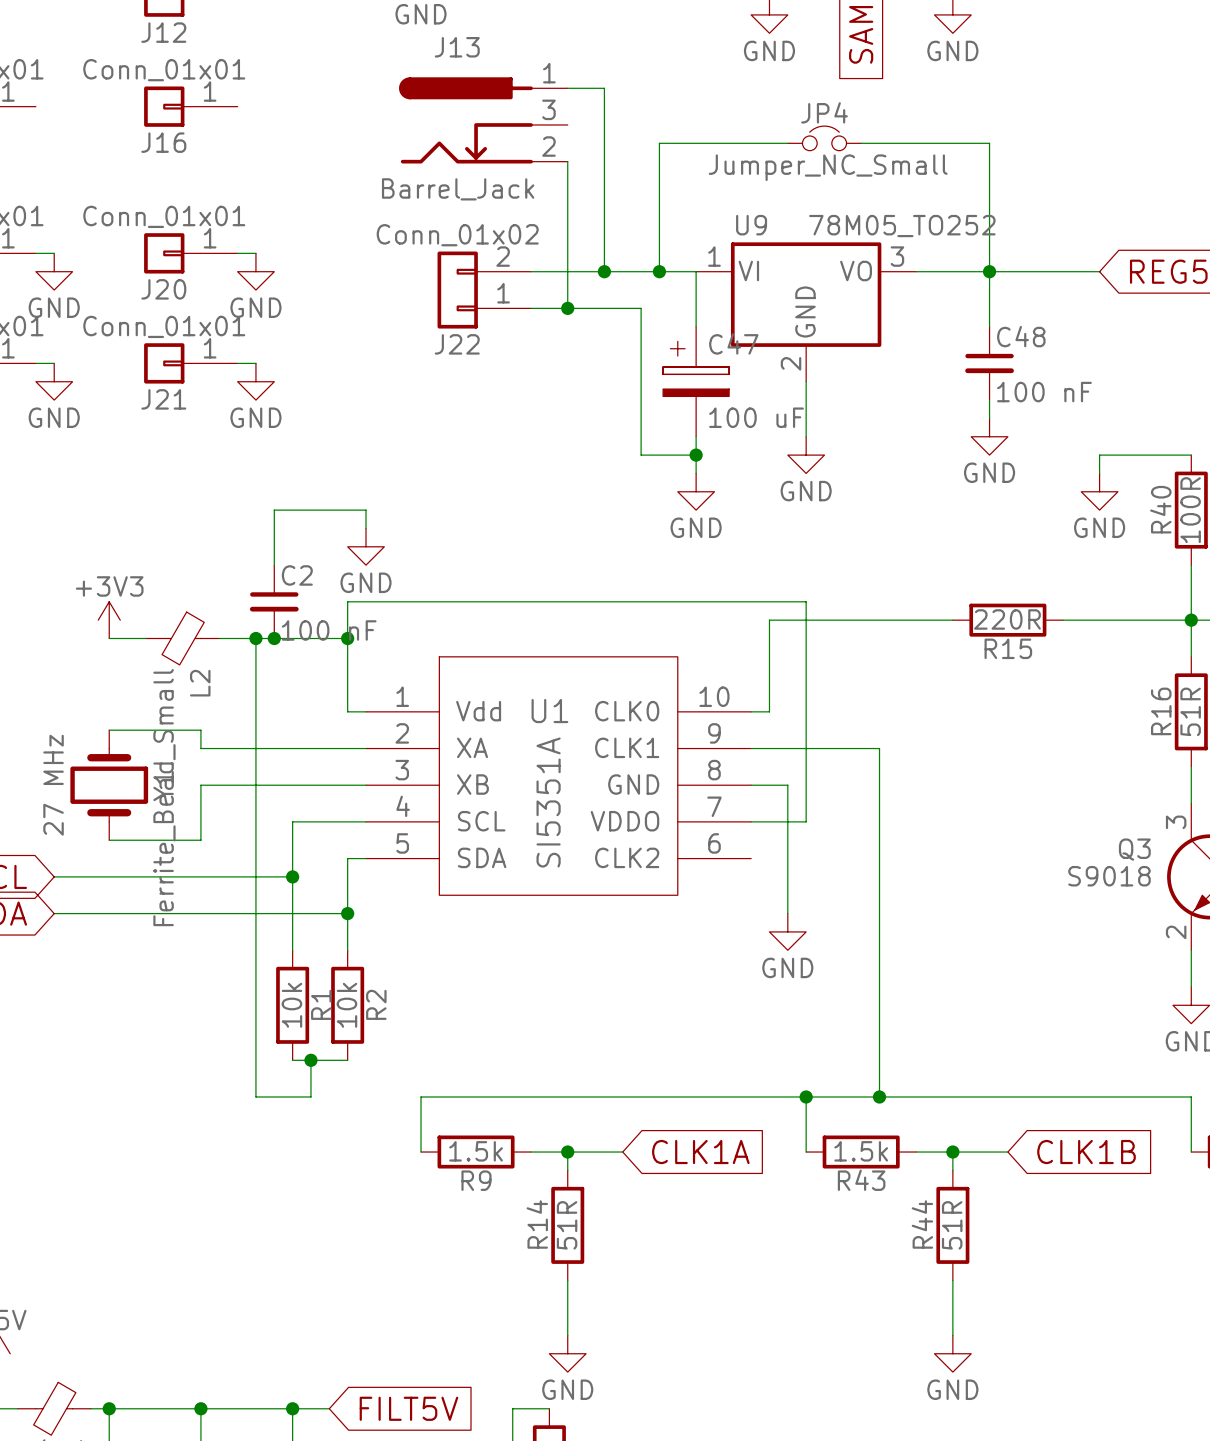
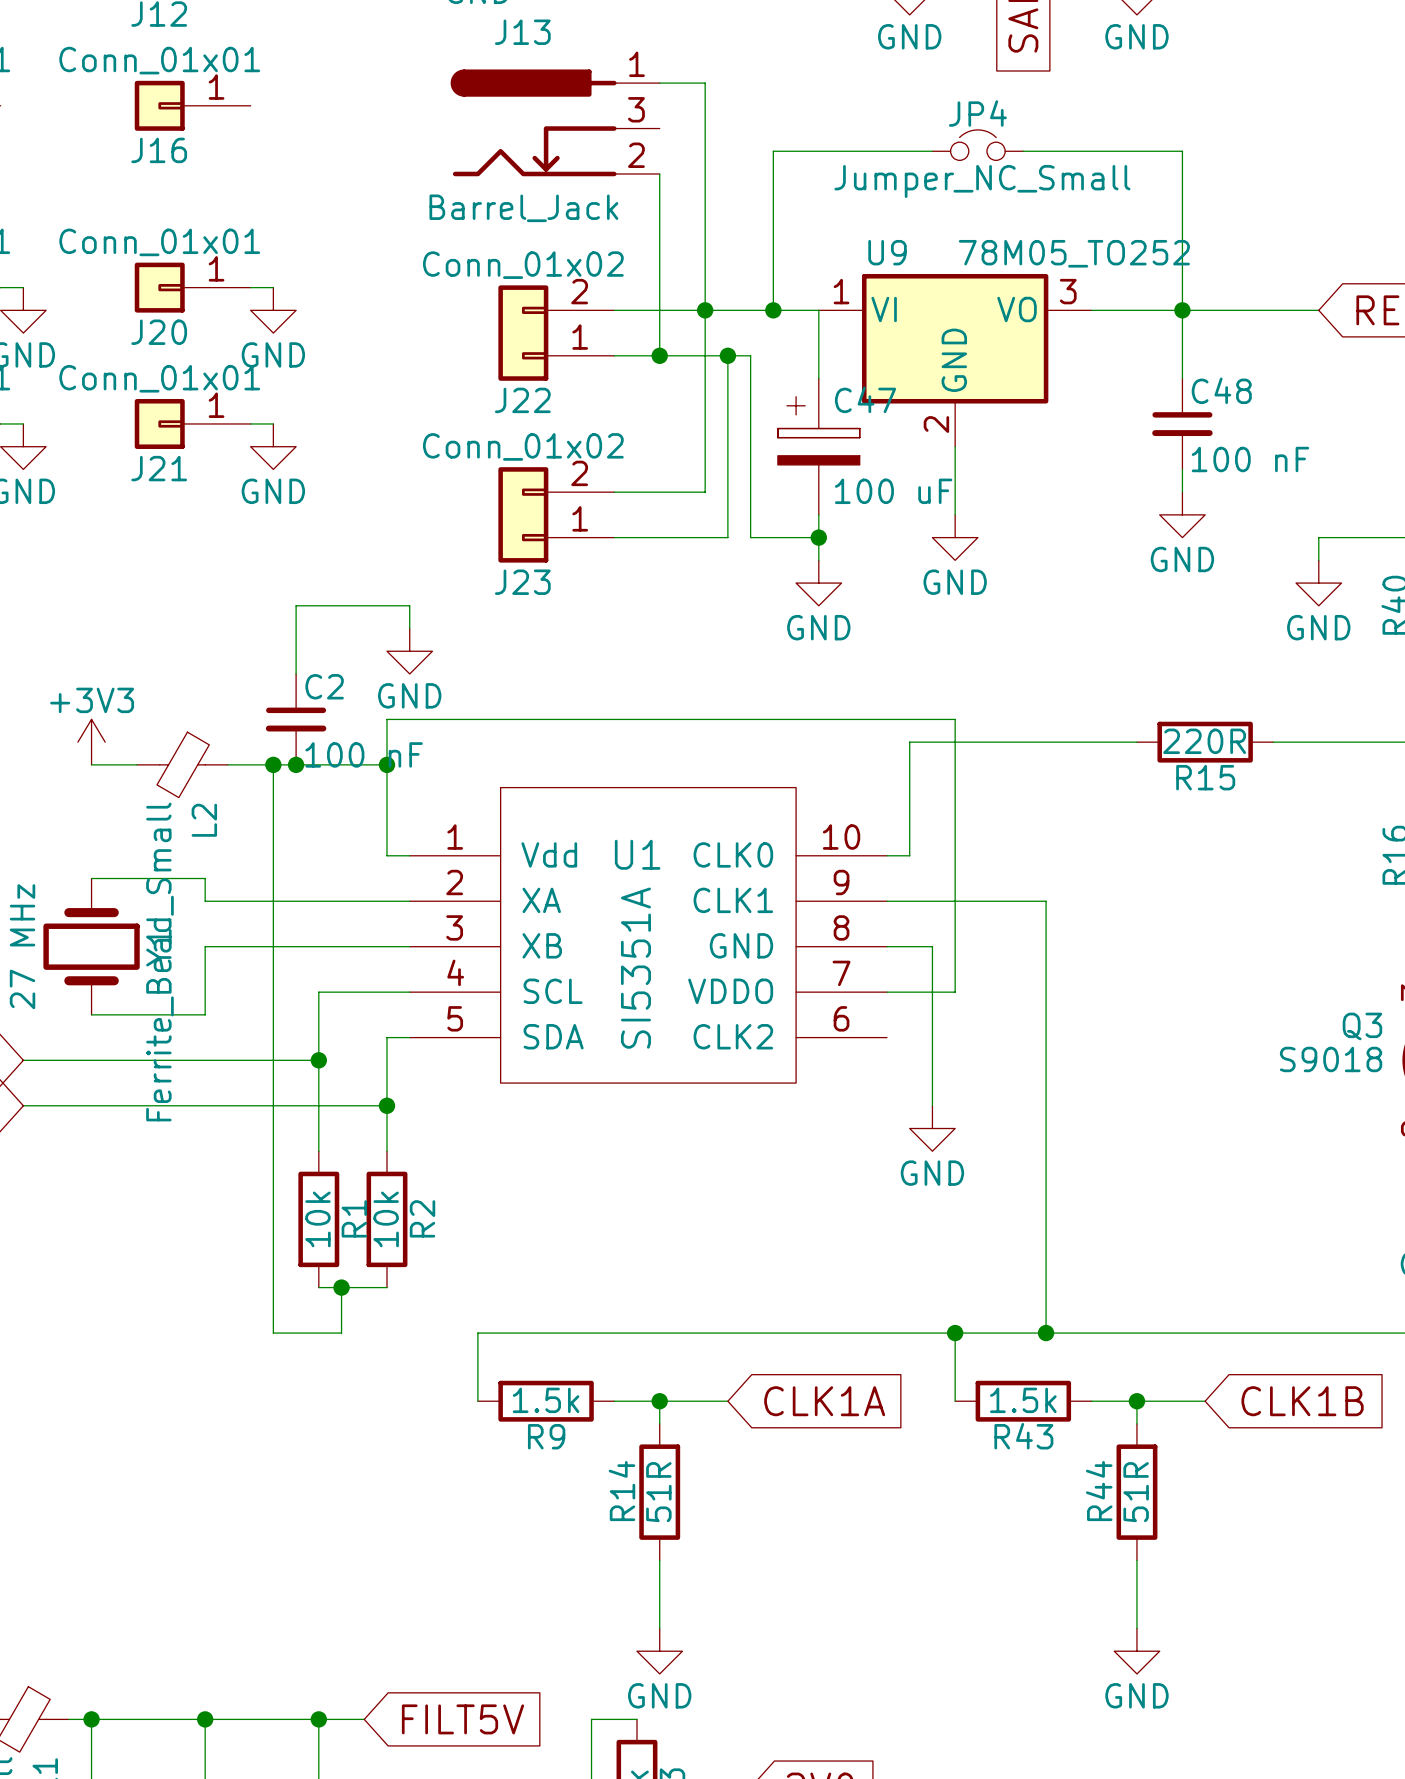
wire: none -> (705, 310) (705, 492) (614, 492)
wire: none -> (727, 355) (727, 537) (614, 537)
junction: none -> (727, 355)
J23: none -> Conn_01x02 (556, 514)

